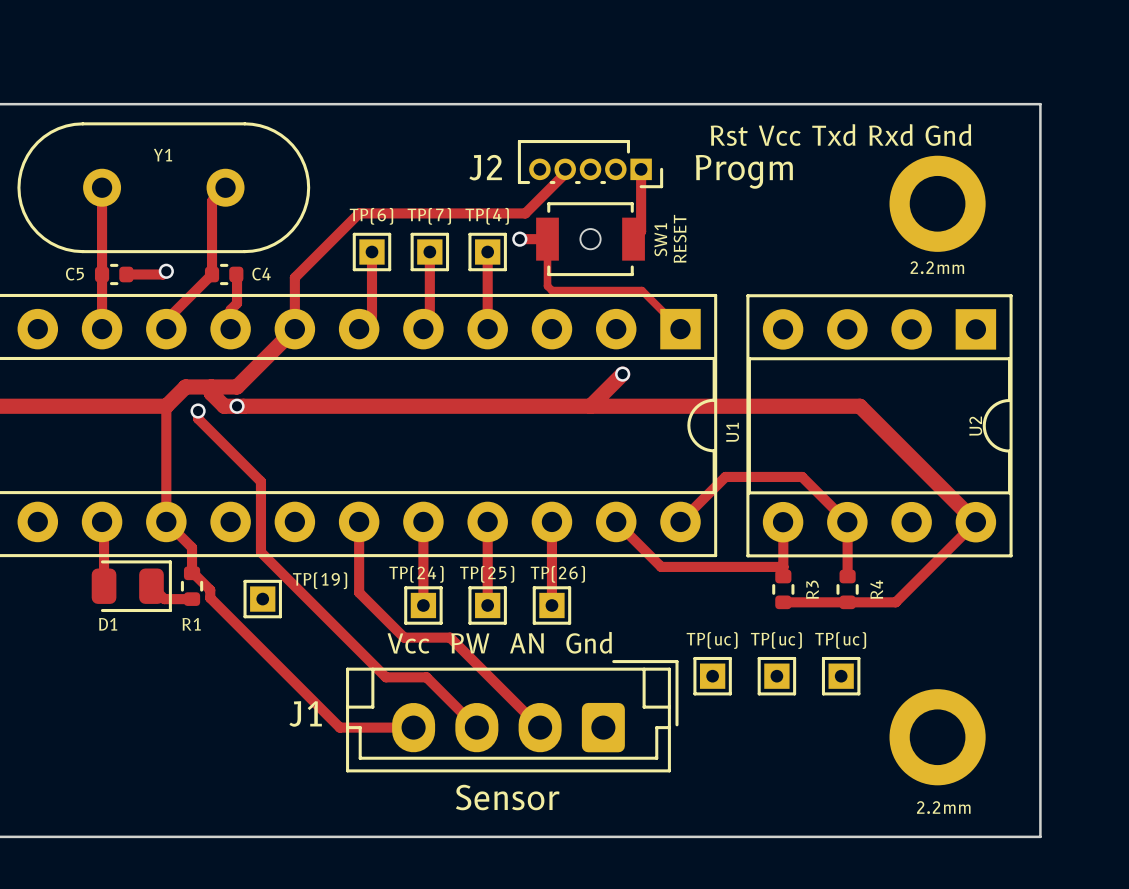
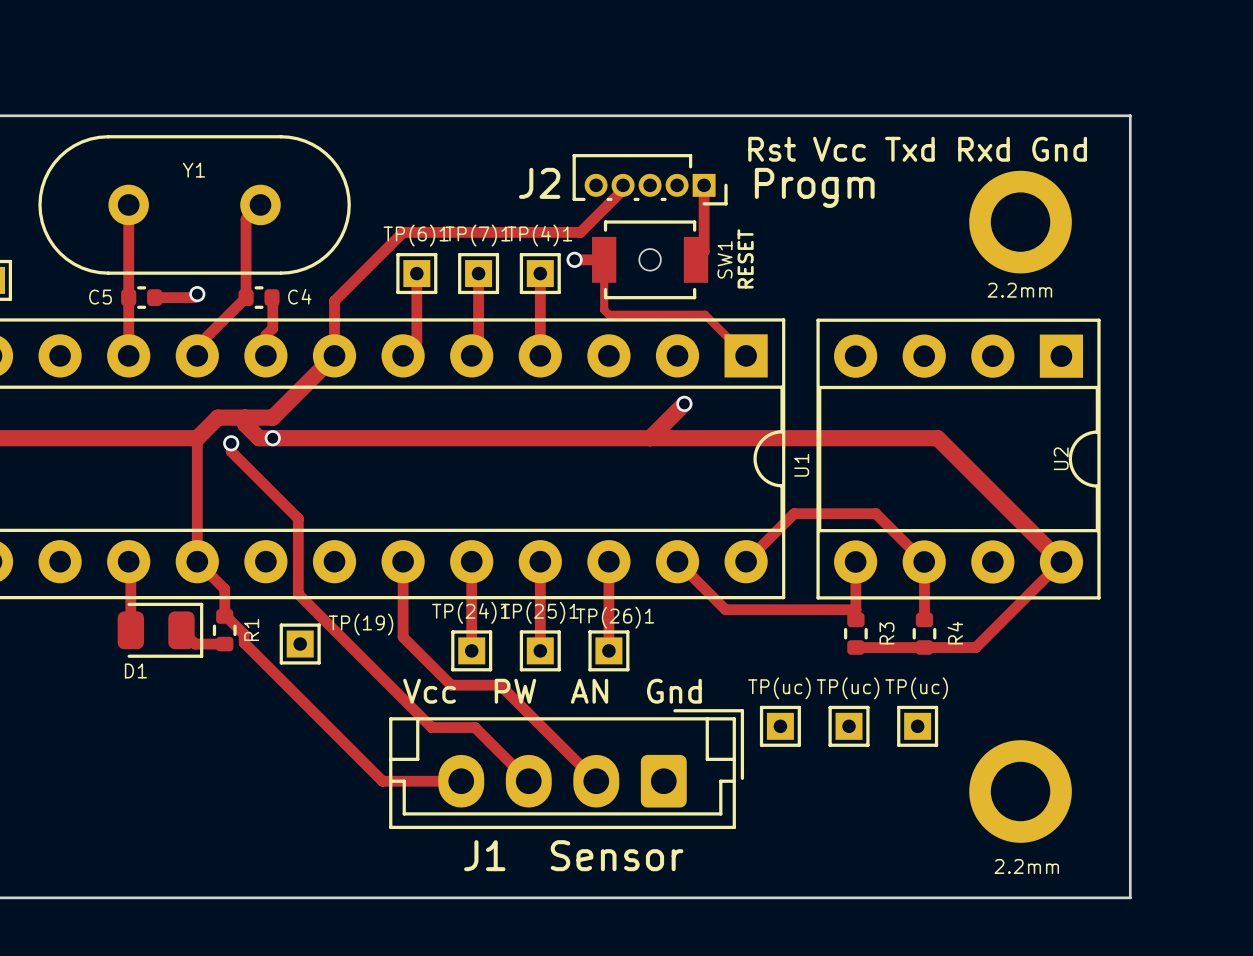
TP(6) name: TP(6) (371, 216) -> TP(6)1 (416, 235)
TP(7) name: TP(7) (429, 216) -> TP(7)1 (477, 235)
TP(4) name: TP(4) (487, 216) -> TP(4)1 (539, 235)
TP(24) name: TP(24) (416, 574) -> TP(24)1 (471, 612)
TP(25) name: TP(25) (487, 574) -> TP(25)1 (539, 612)
TP(26) name: TP(26) (557, 574) -> TP(26)1 (615, 617)
R1 name rotation: 0° (191, 624) -> 90° counterclockwise (251, 629)
R1 name position: R1 (191, 624) -> R1 (251, 629)
J1 name position: J1 (305, 713) -> J1 (484, 855)
J1 value position: Sensor (507, 797) -> Sensor (617, 855)

